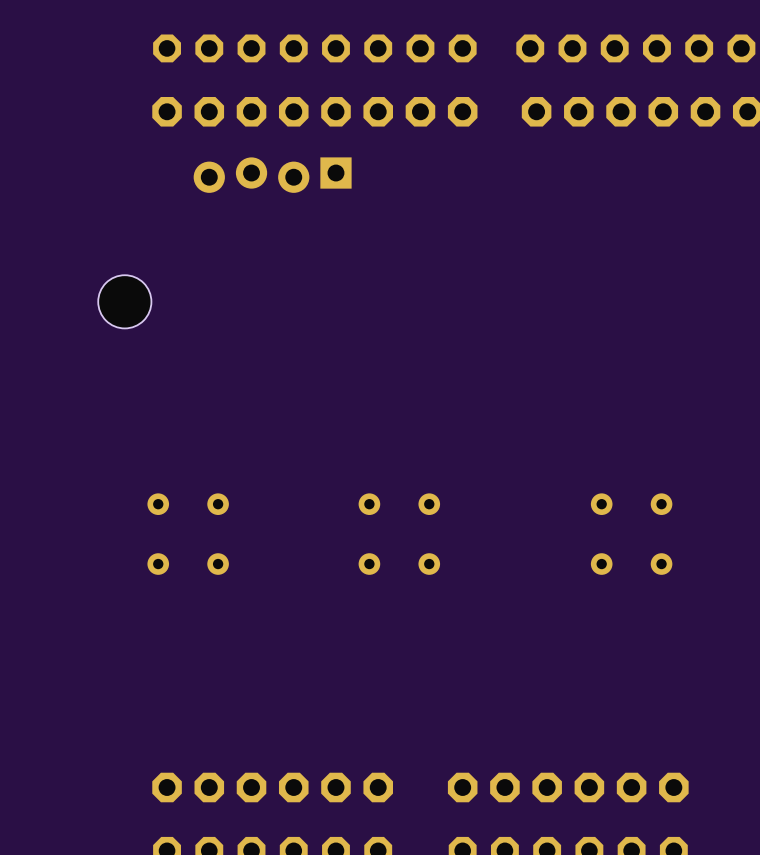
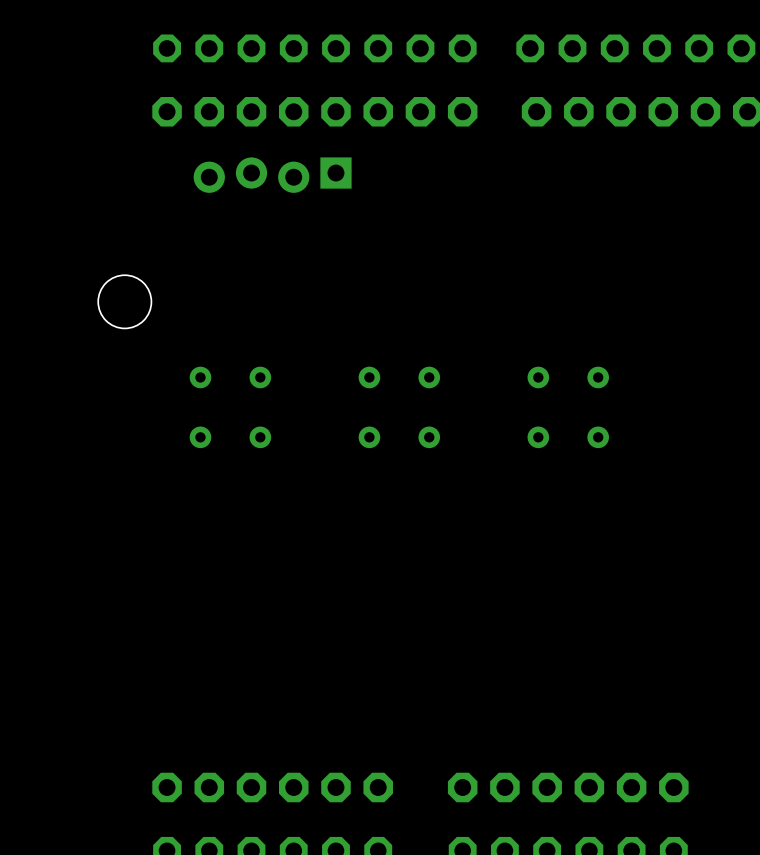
part: none -> (230, 407)
part: none -> (399, 407)
part: none -> (568, 407)
part: (188, 534) -> none
part: (399, 534) -> none
part: (631, 534) -> none

